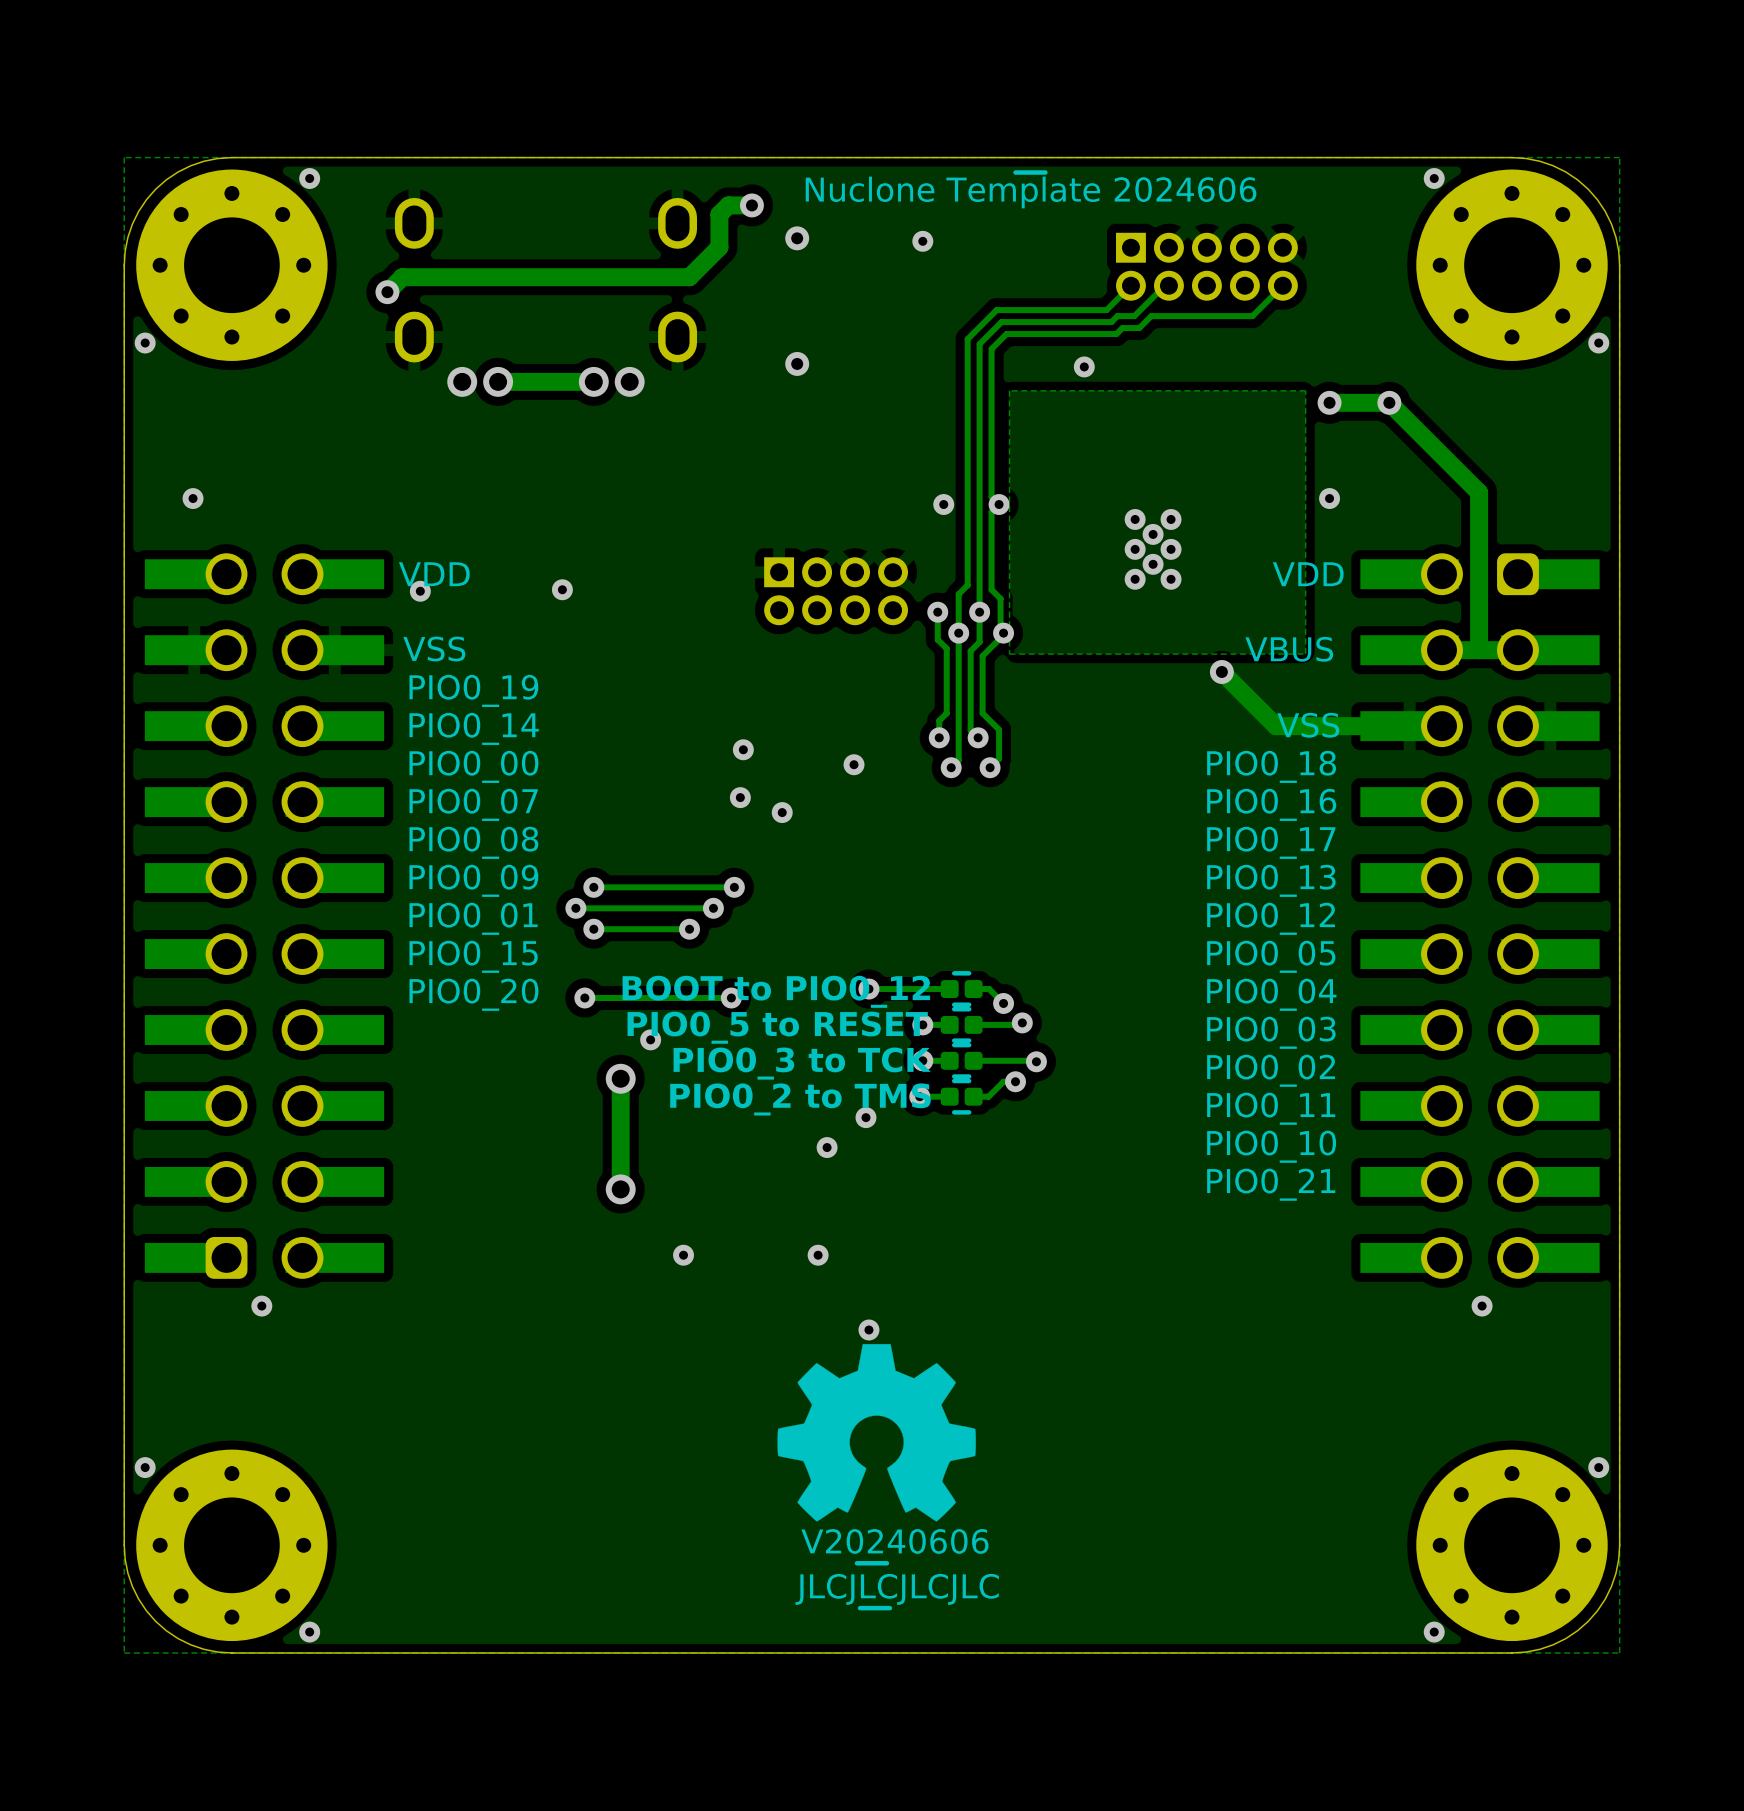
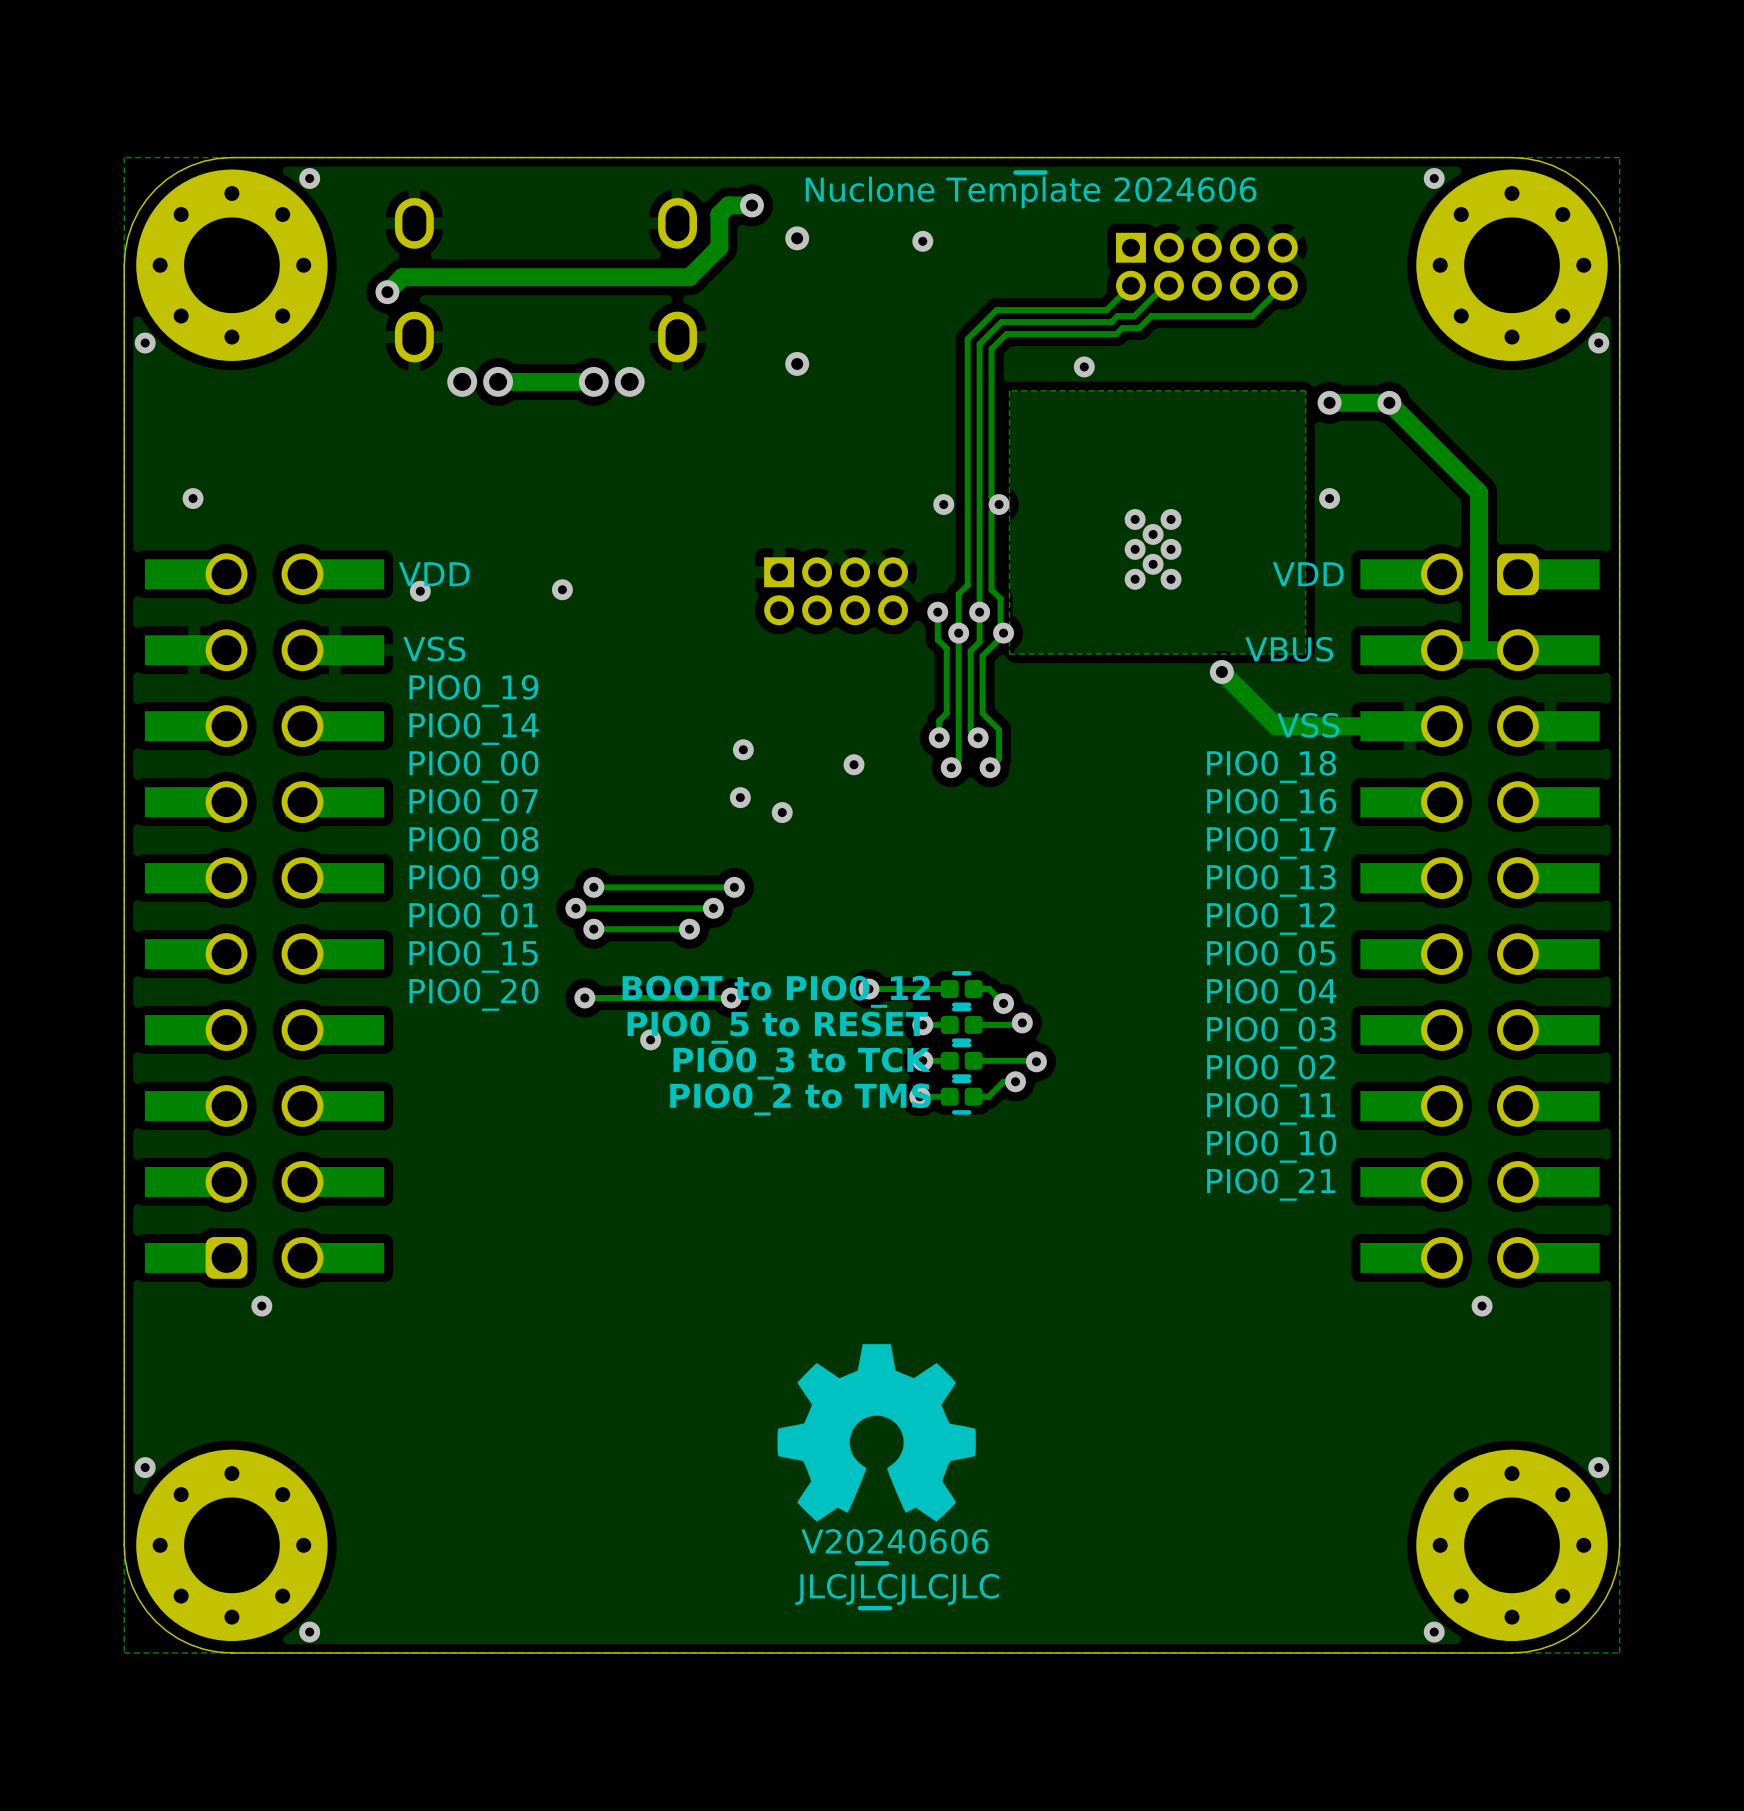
track: (620, 1078) (620, 1189) -> none
via: (620, 1078) -> none
via: (865, 1117) -> none
via: (827, 1147) -> none
via: (620, 1189) -> none
via: (683, 1255) -> none
via: (818, 1255) -> none
via: (868, 1329) -> none

